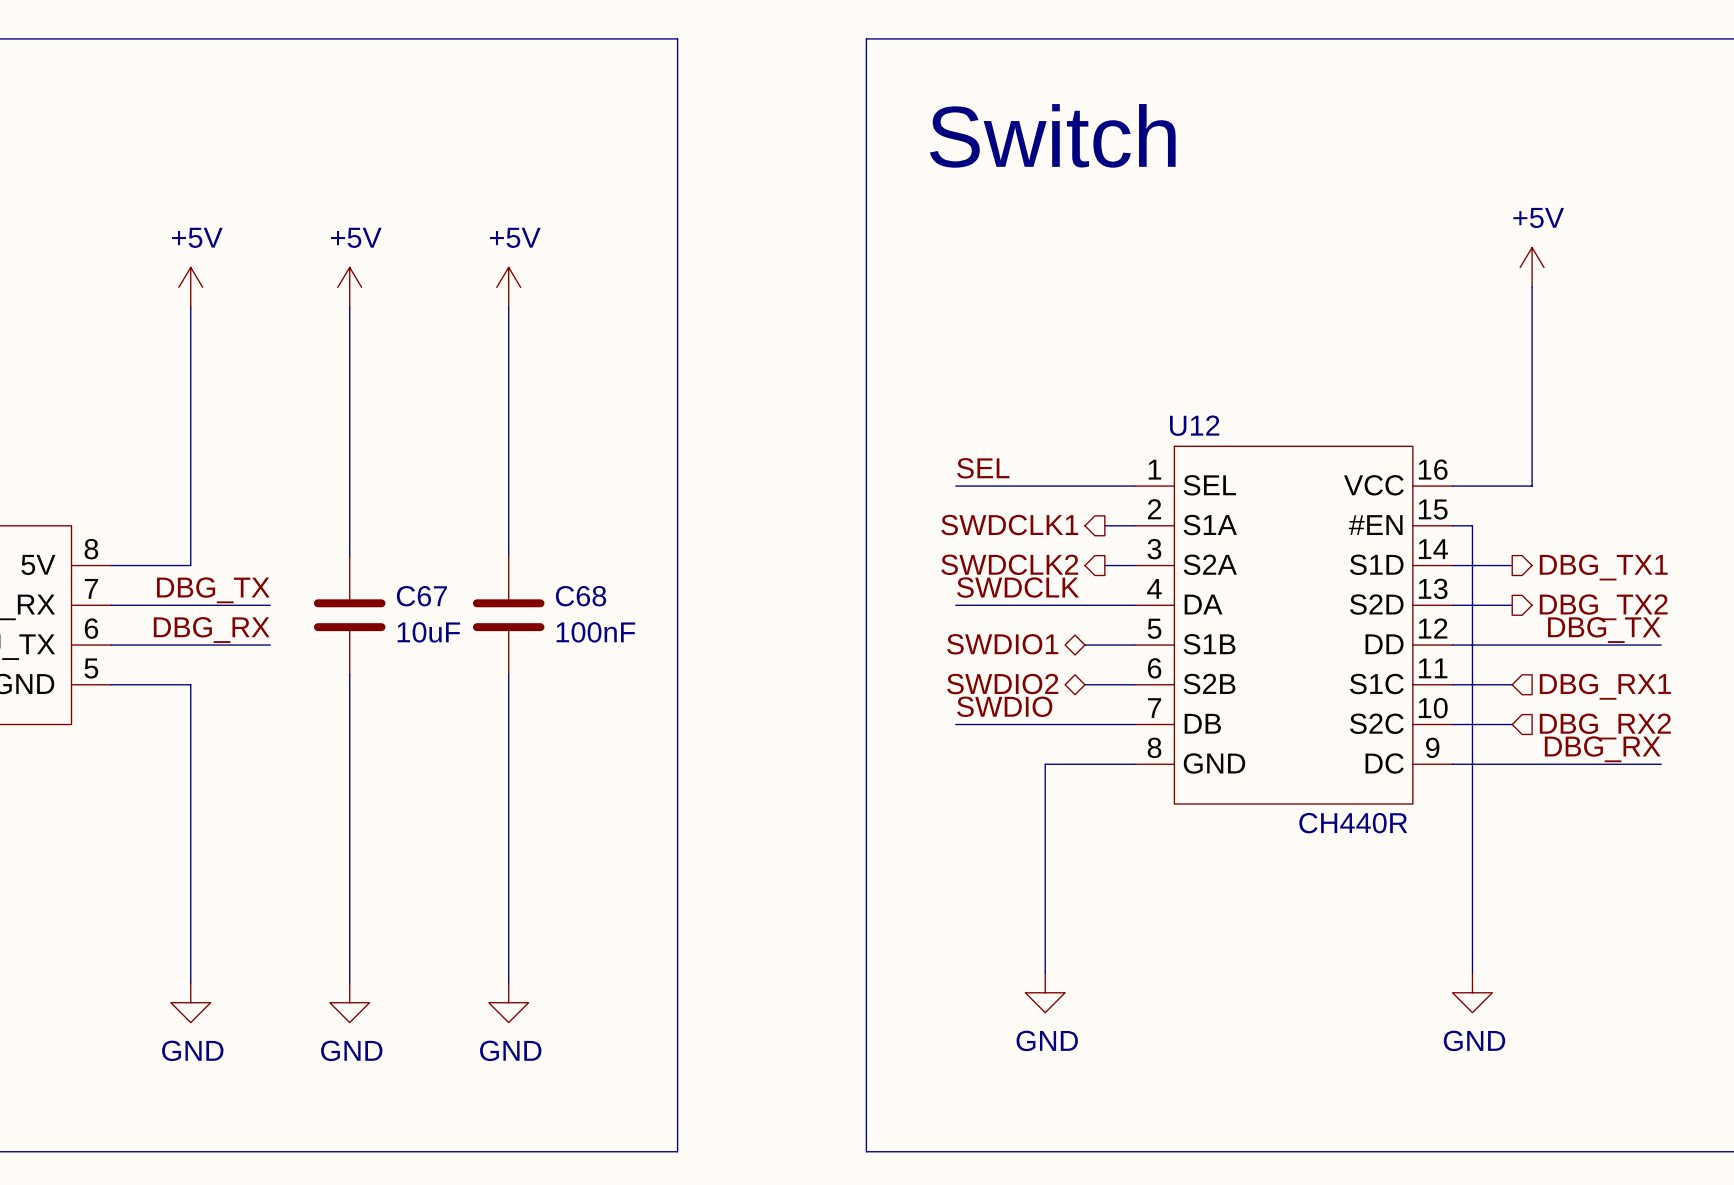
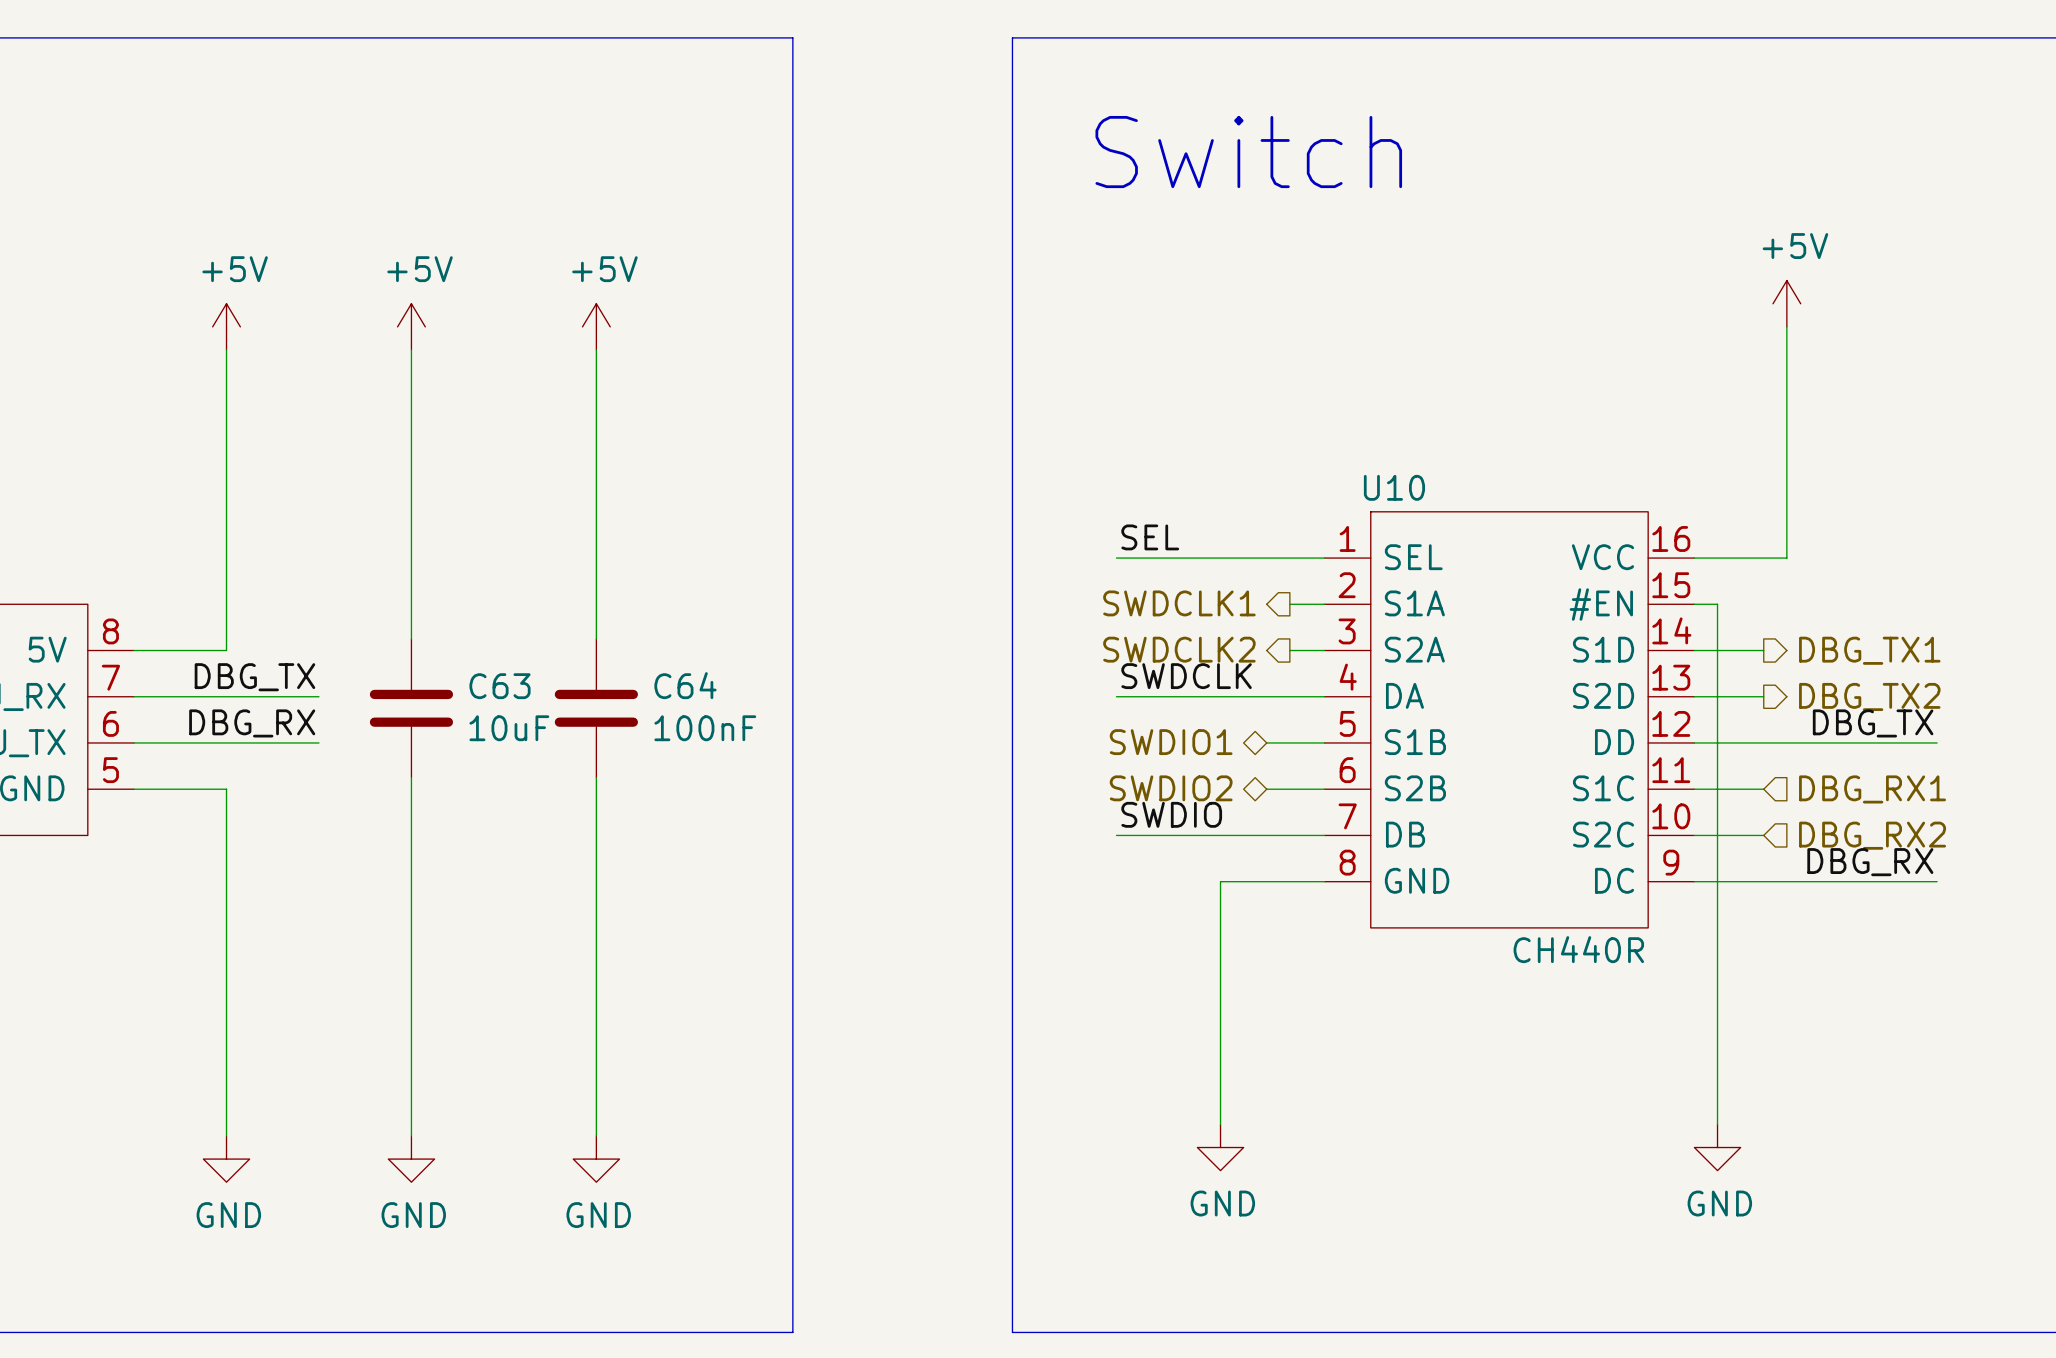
U12 name: U12 (1194, 425) -> U10 (1394, 487)
C67 name: C67 (421, 596) -> C63 (500, 686)
C68 name: C68 (581, 596) -> C64 (685, 685)

